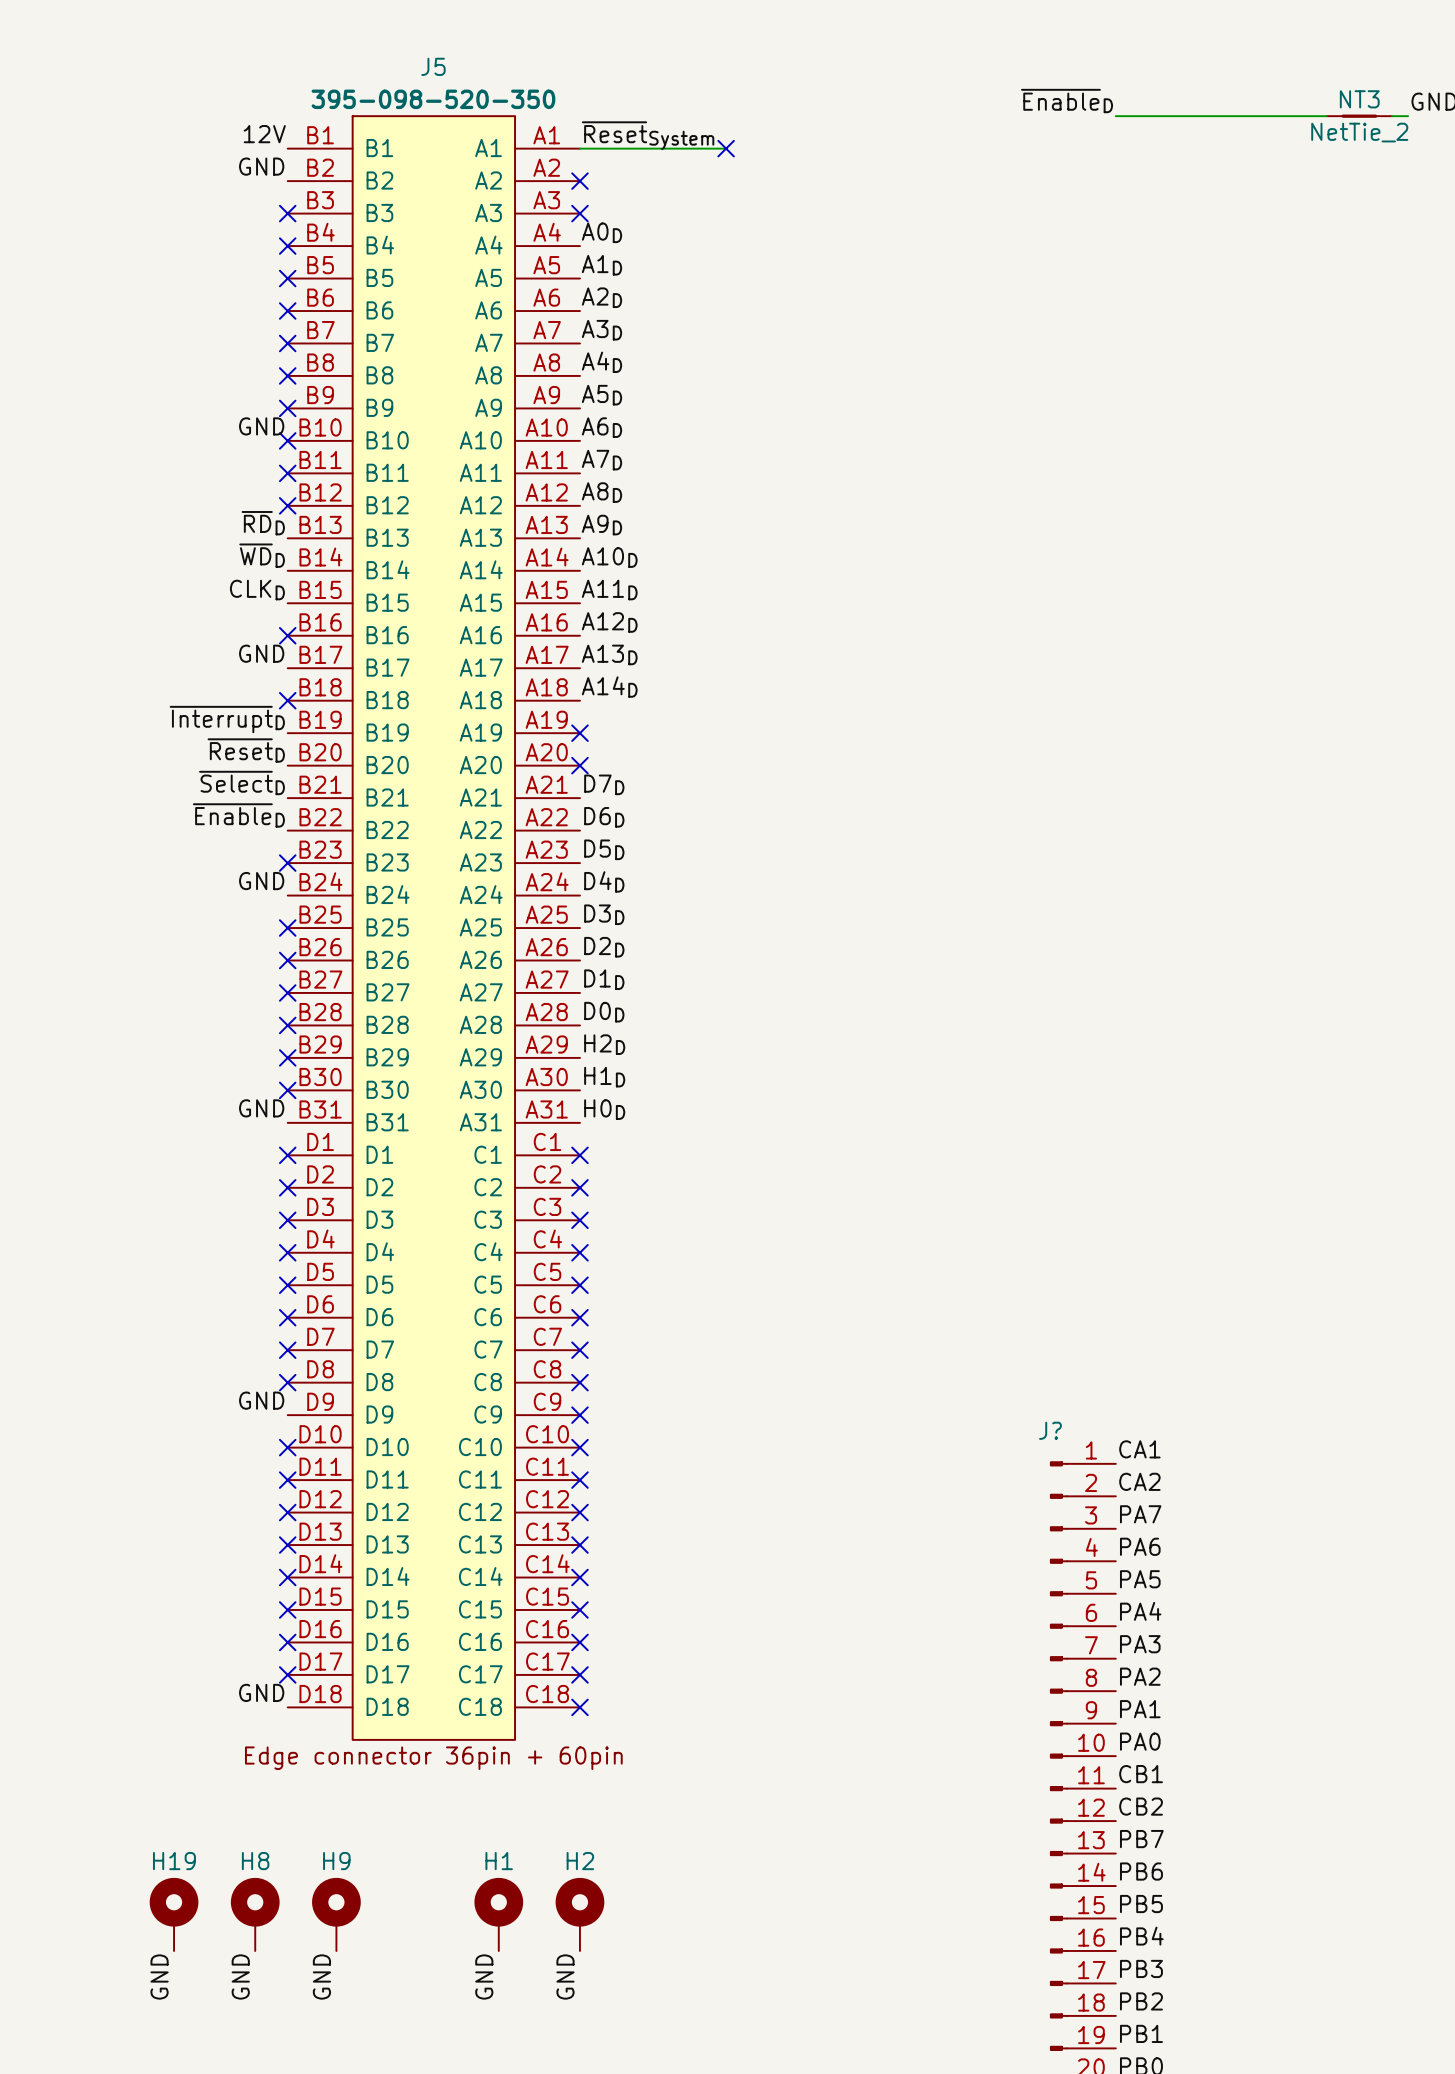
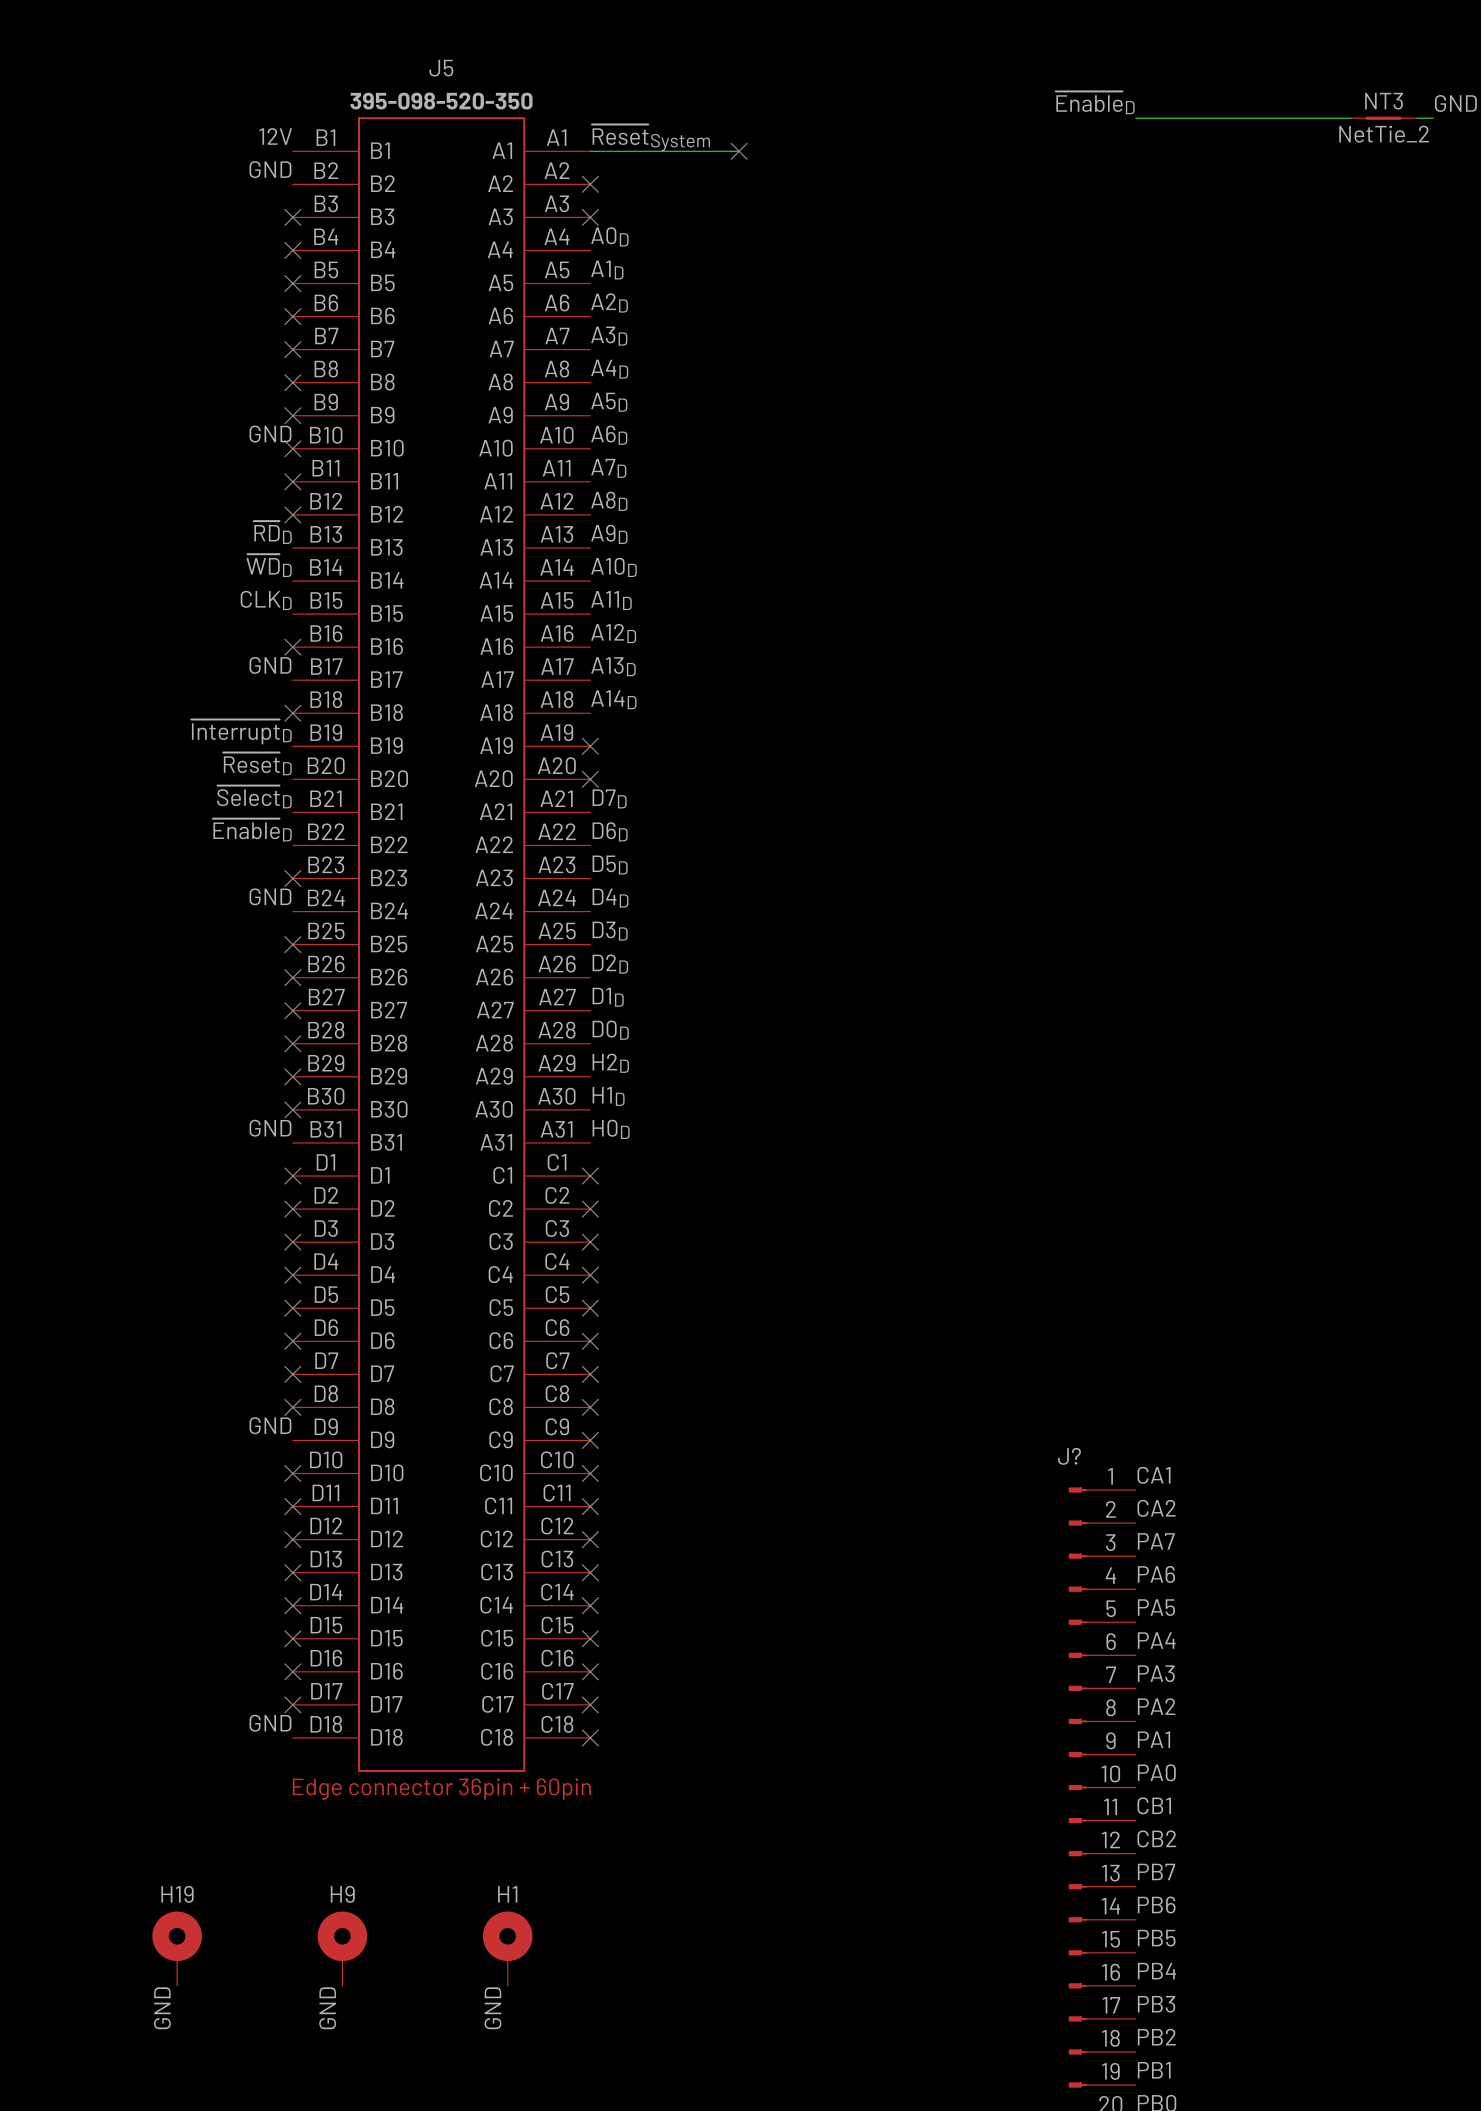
H8: (255, 1914) -> none
H2: (579, 1914) -> none
label: GND (240, 1977) -> none
label: GND (565, 1977) -> none

